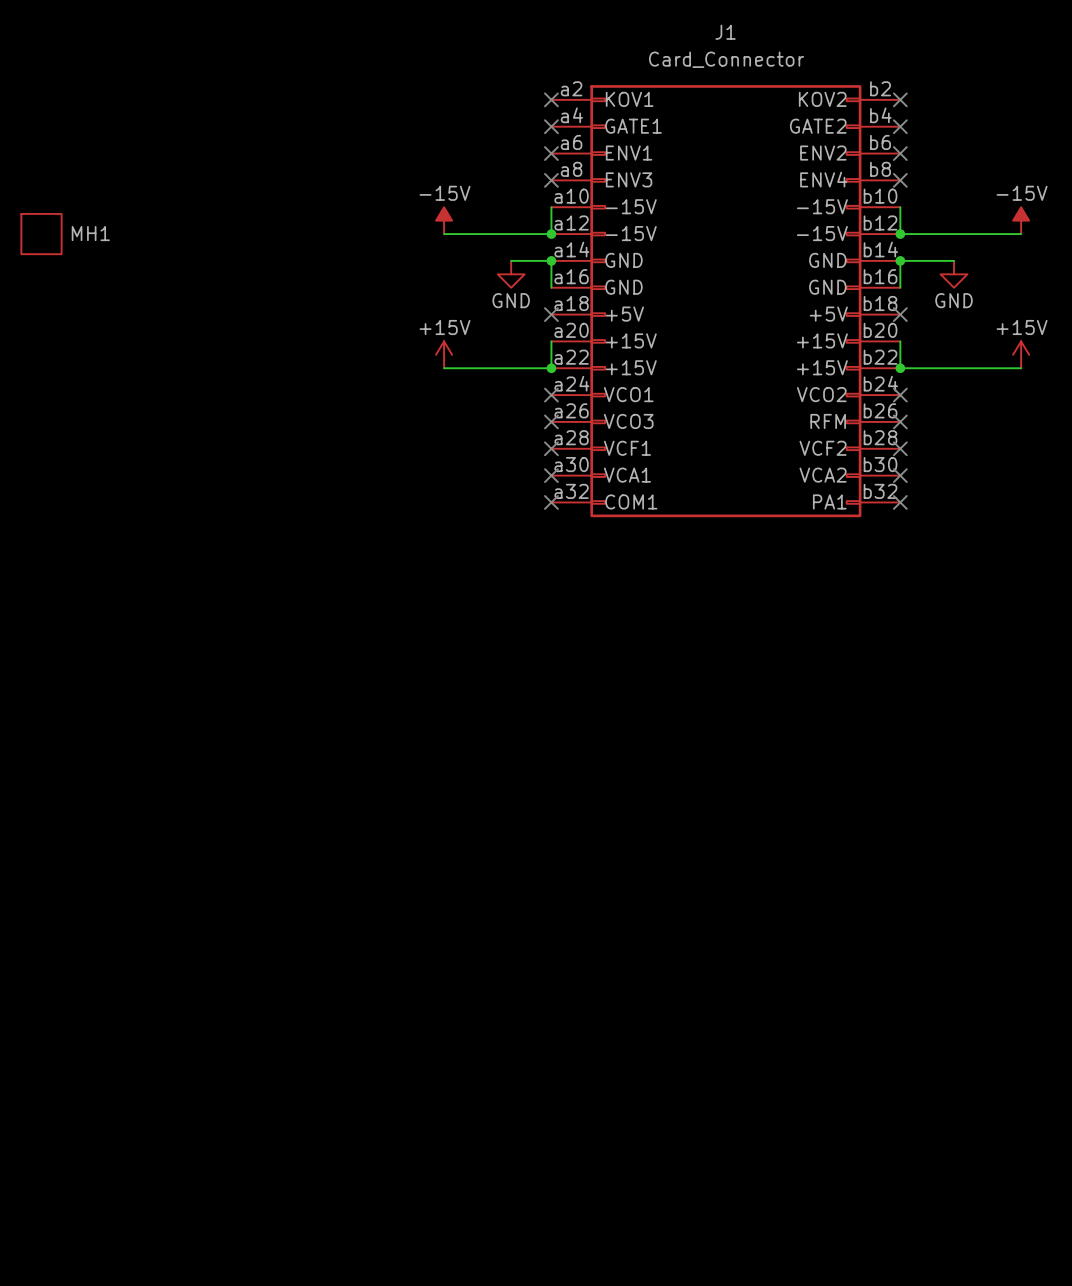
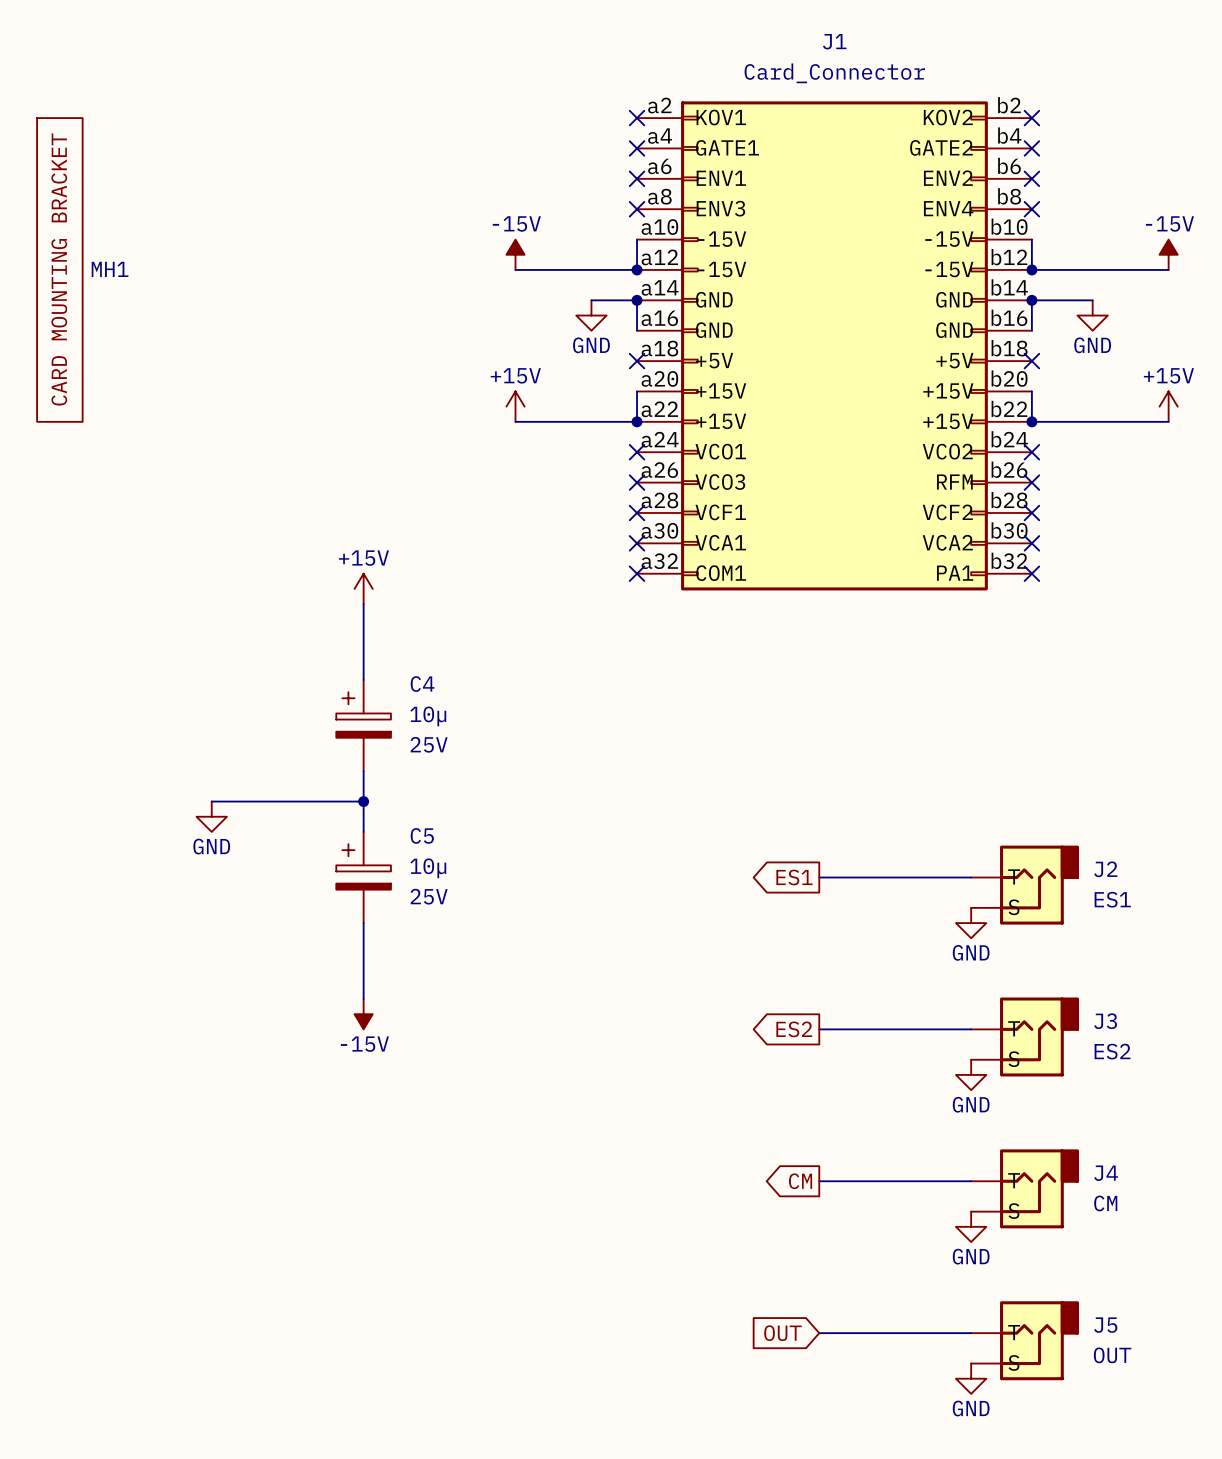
MH1 symbol: [21, 213, 62, 255] -> [37, 118, 83, 422]
power symbol: none -> +15V (363, 588)
wire: none -> (363, 604) (363, 680)
C4: none -> 10µ (363, 725)
wire: none -> (363, 771) (363, 831)
wire: none -> (211, 801) (363, 801)
junction: none -> (363, 801)
power symbol: none -> GND (211, 816)
C5: none -> 10µ (363, 877)
global label: none -> ES1 (794, 877)
wire: none -> (819, 877) (971, 877)
J2: none -> ES1 (1025, 885)
wire: none -> (363, 923) (363, 999)
power symbol: none -> GND (971, 923)
power symbol: none -> -15V (363, 1014)
global label: none -> ES2 (794, 1029)
wire: none -> (819, 1029) (971, 1029)
J3: none -> ES2 (1025, 1036)
power symbol: none -> GND (971, 1074)
global label: none -> CM (800, 1181)
wire: none -> (819, 1181) (971, 1181)
J4: none -> CM (1025, 1188)
power symbol: none -> GND (971, 1226)
global label: none -> OUT (782, 1333)
wire: none -> (819, 1333) (971, 1333)
J5: none -> OUT (1025, 1340)
power symbol: none -> GND (971, 1378)

